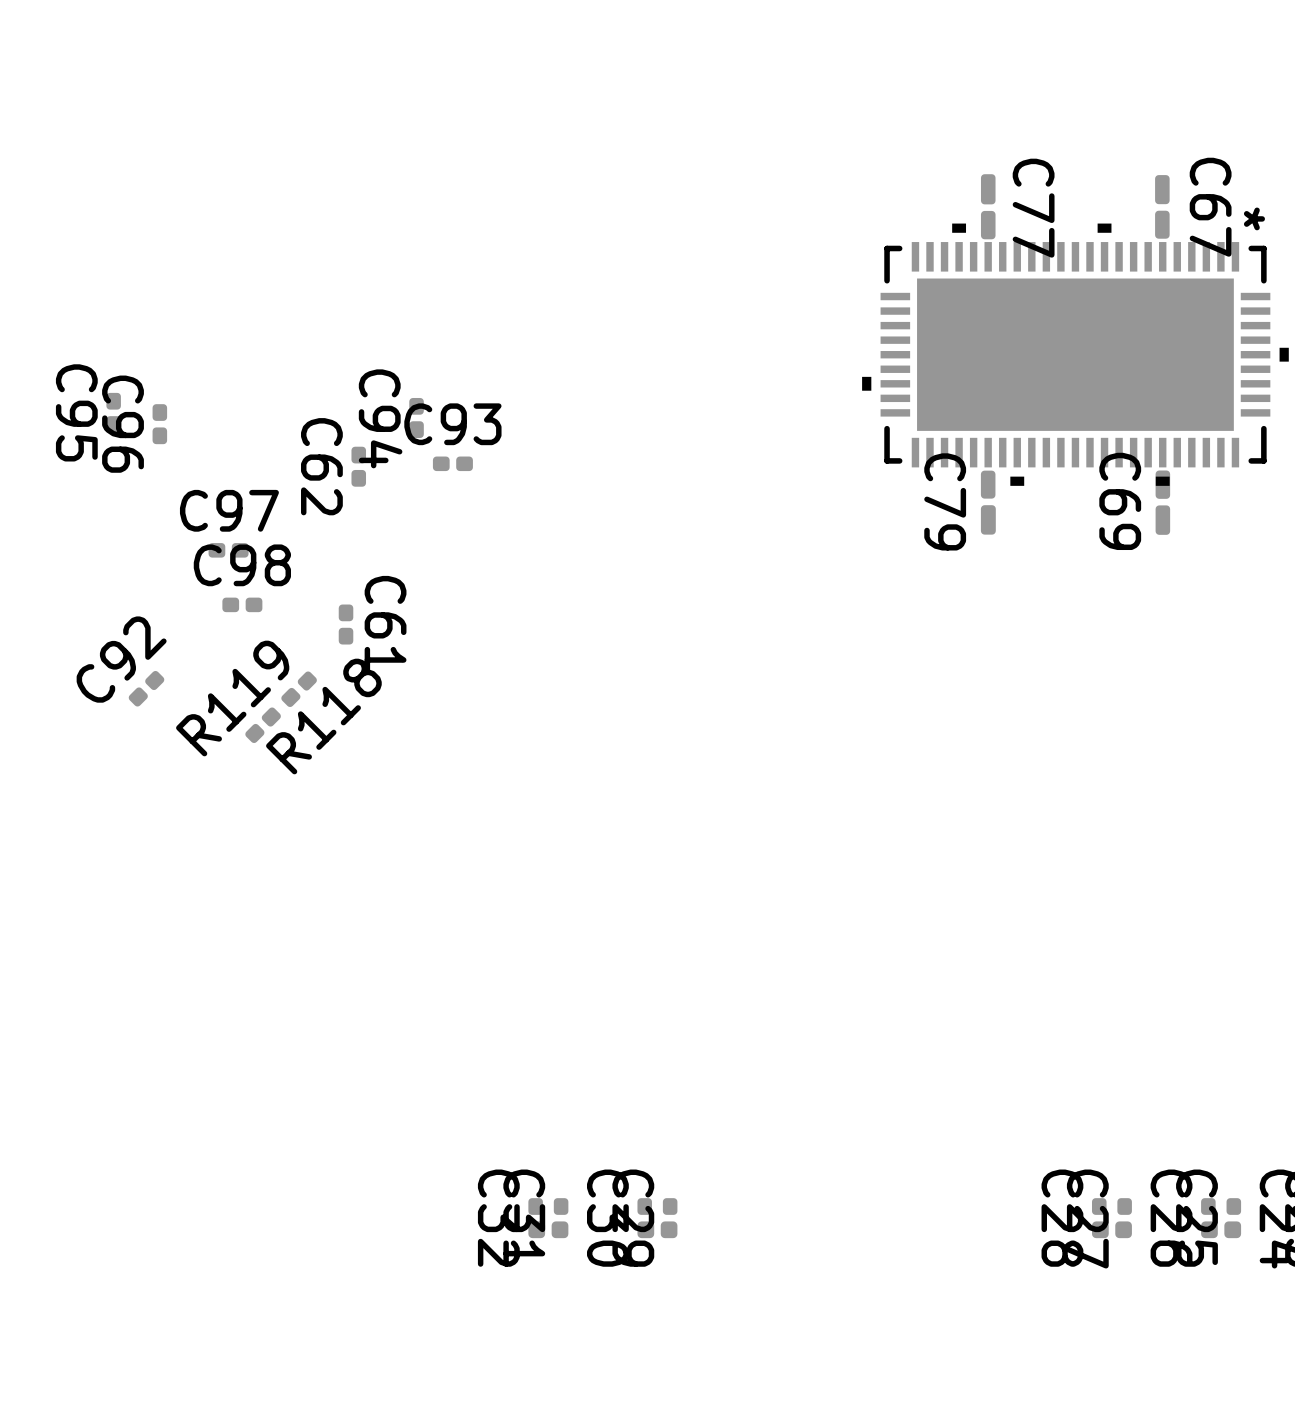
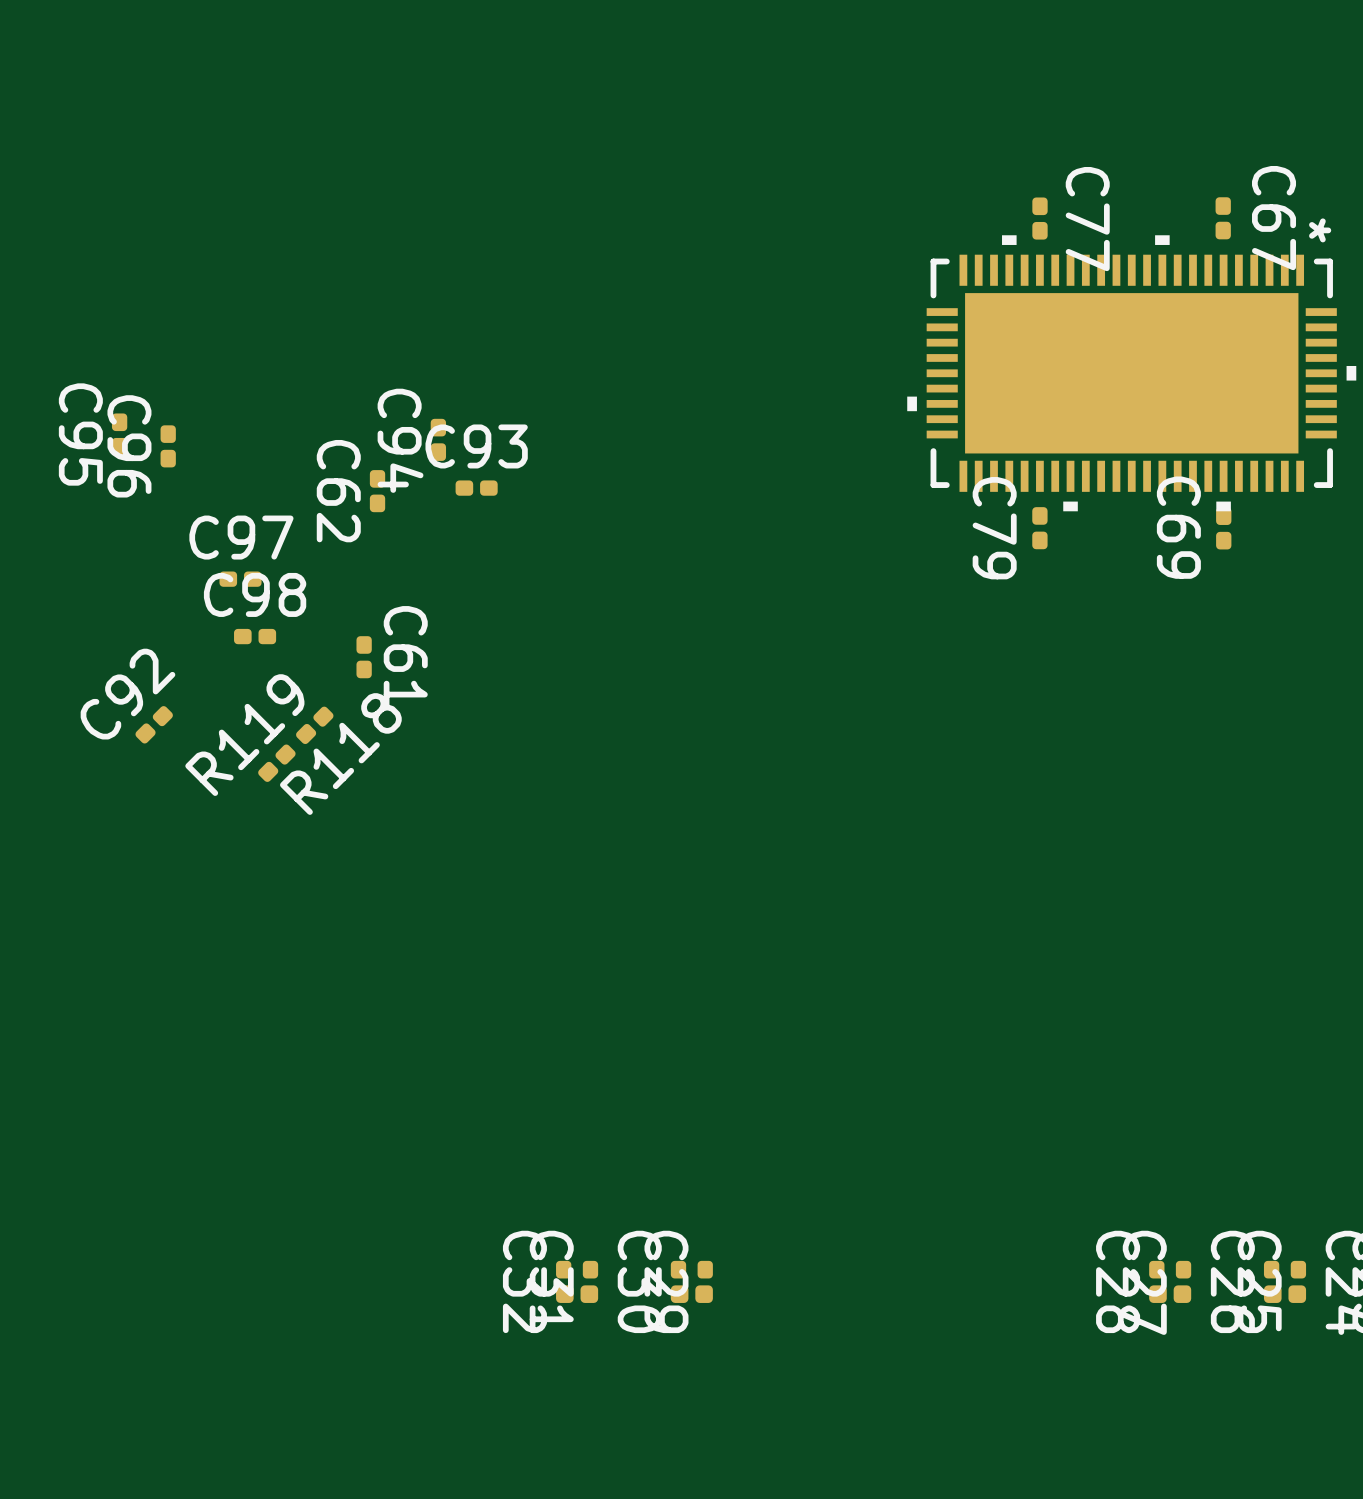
C77 footprint: [980, 174, 996, 240] -> [1032, 197, 1048, 240]
C67 footprint: [1155, 175, 1170, 239] -> [1215, 197, 1231, 240]
C79 footprint: [980, 470, 996, 535] -> [1032, 507, 1048, 550]
C69 footprint: [1155, 470, 1171, 535] -> [1216, 507, 1232, 550]

